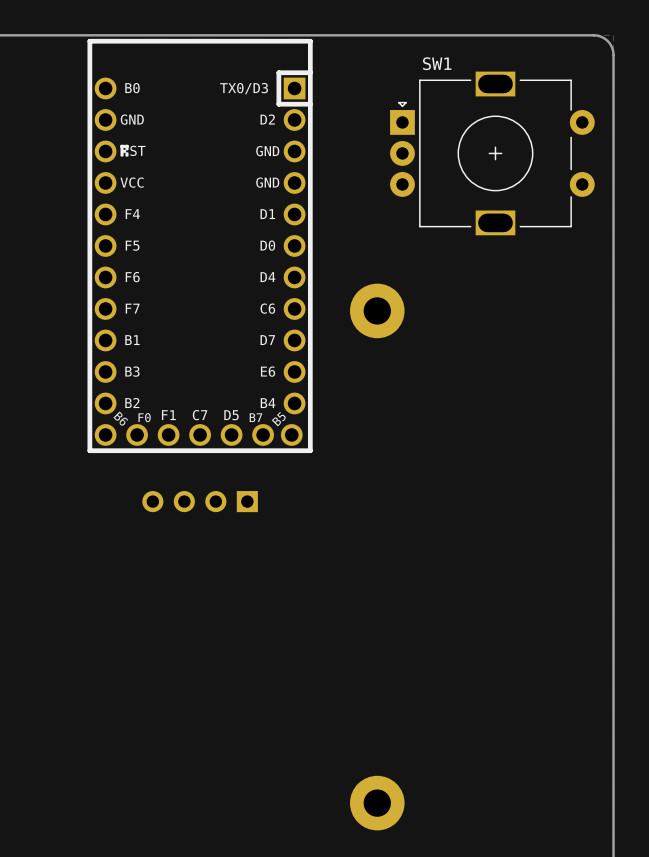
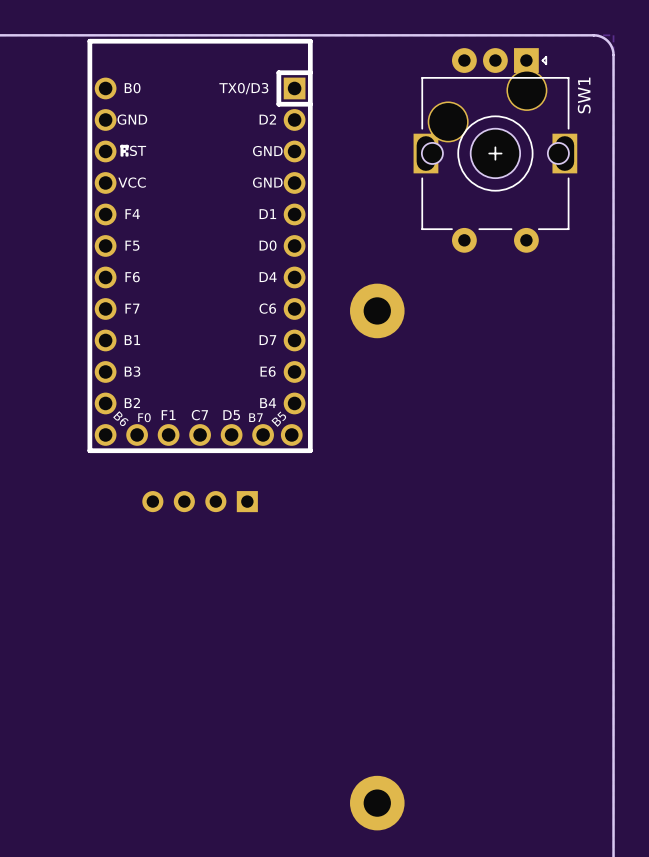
part: none -> (495, 124)
SW1 rotation: 0° (492, 153) -> 90° clockwise (495, 150)

